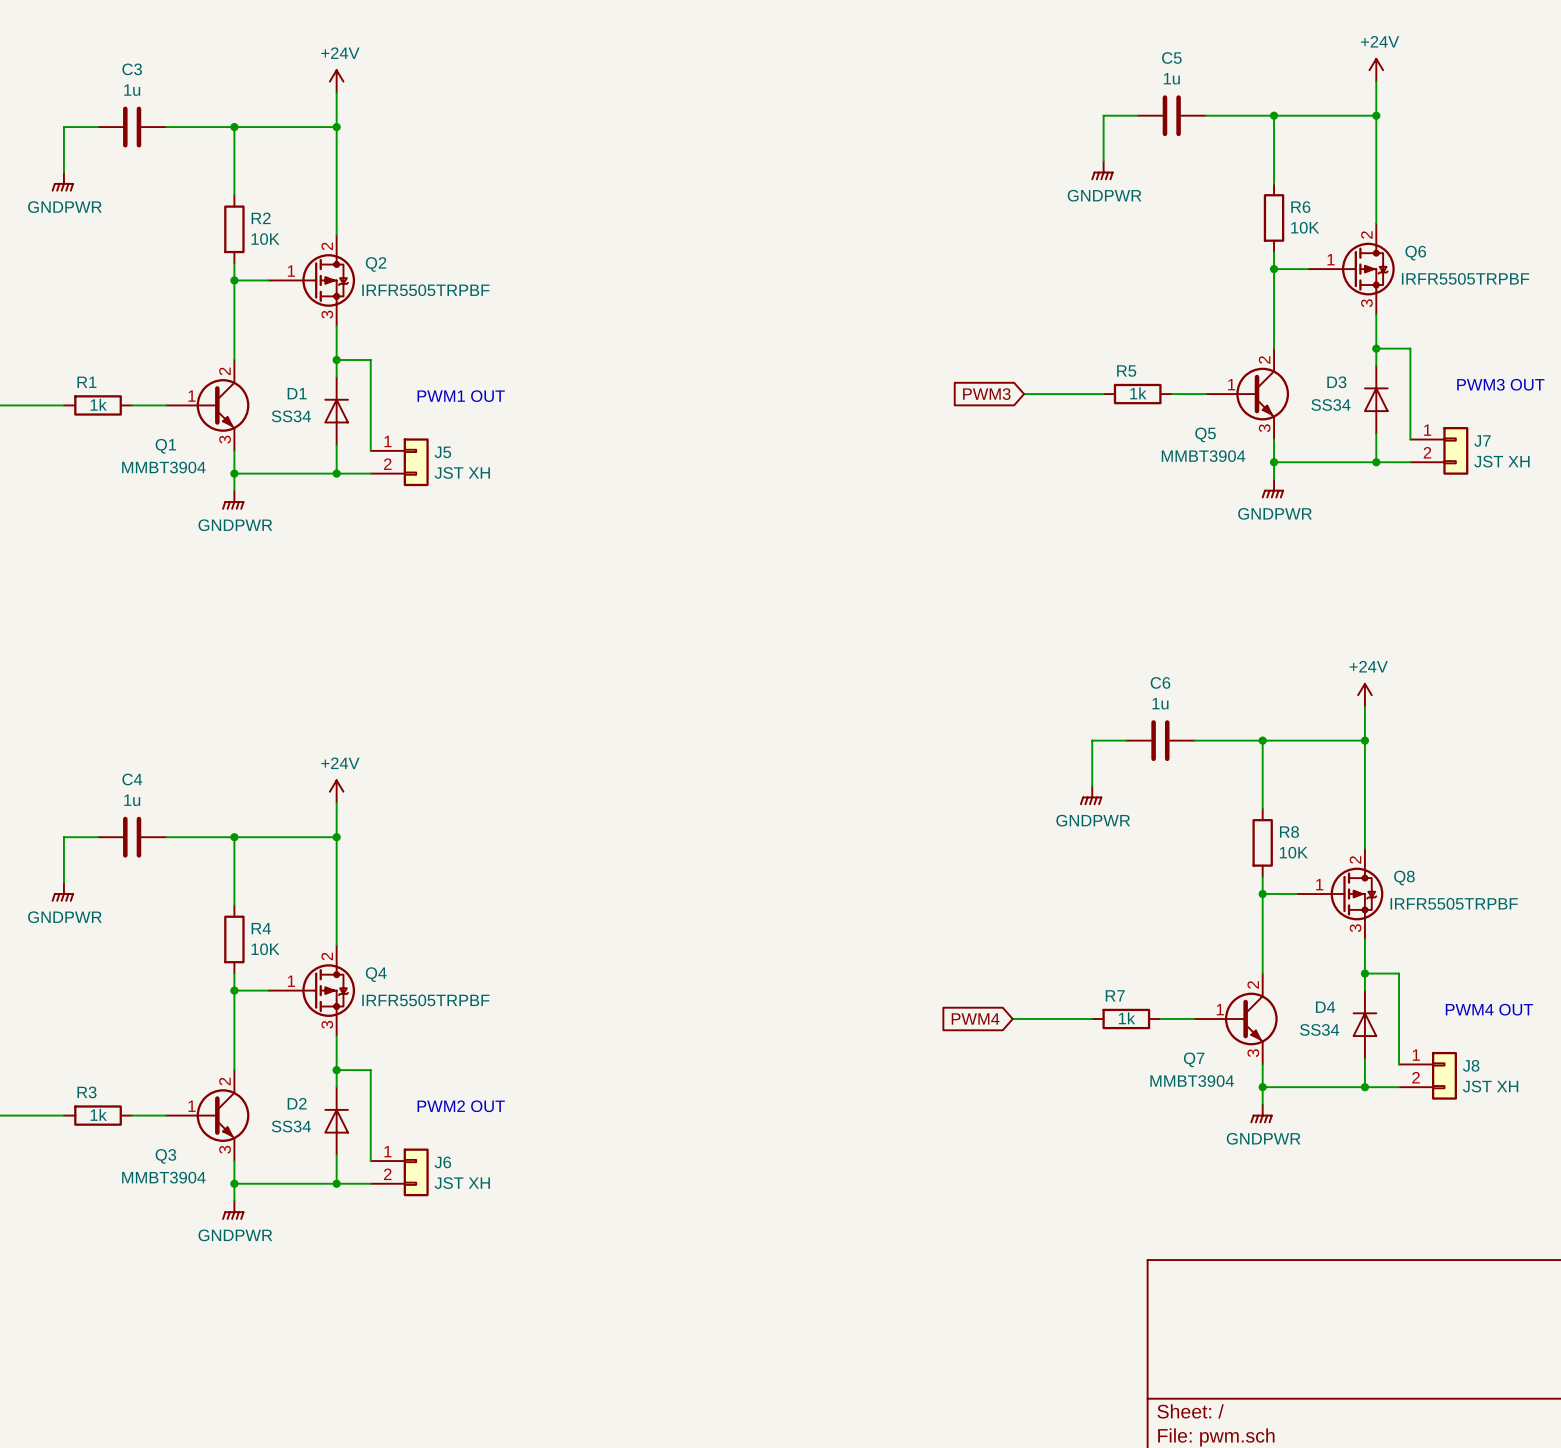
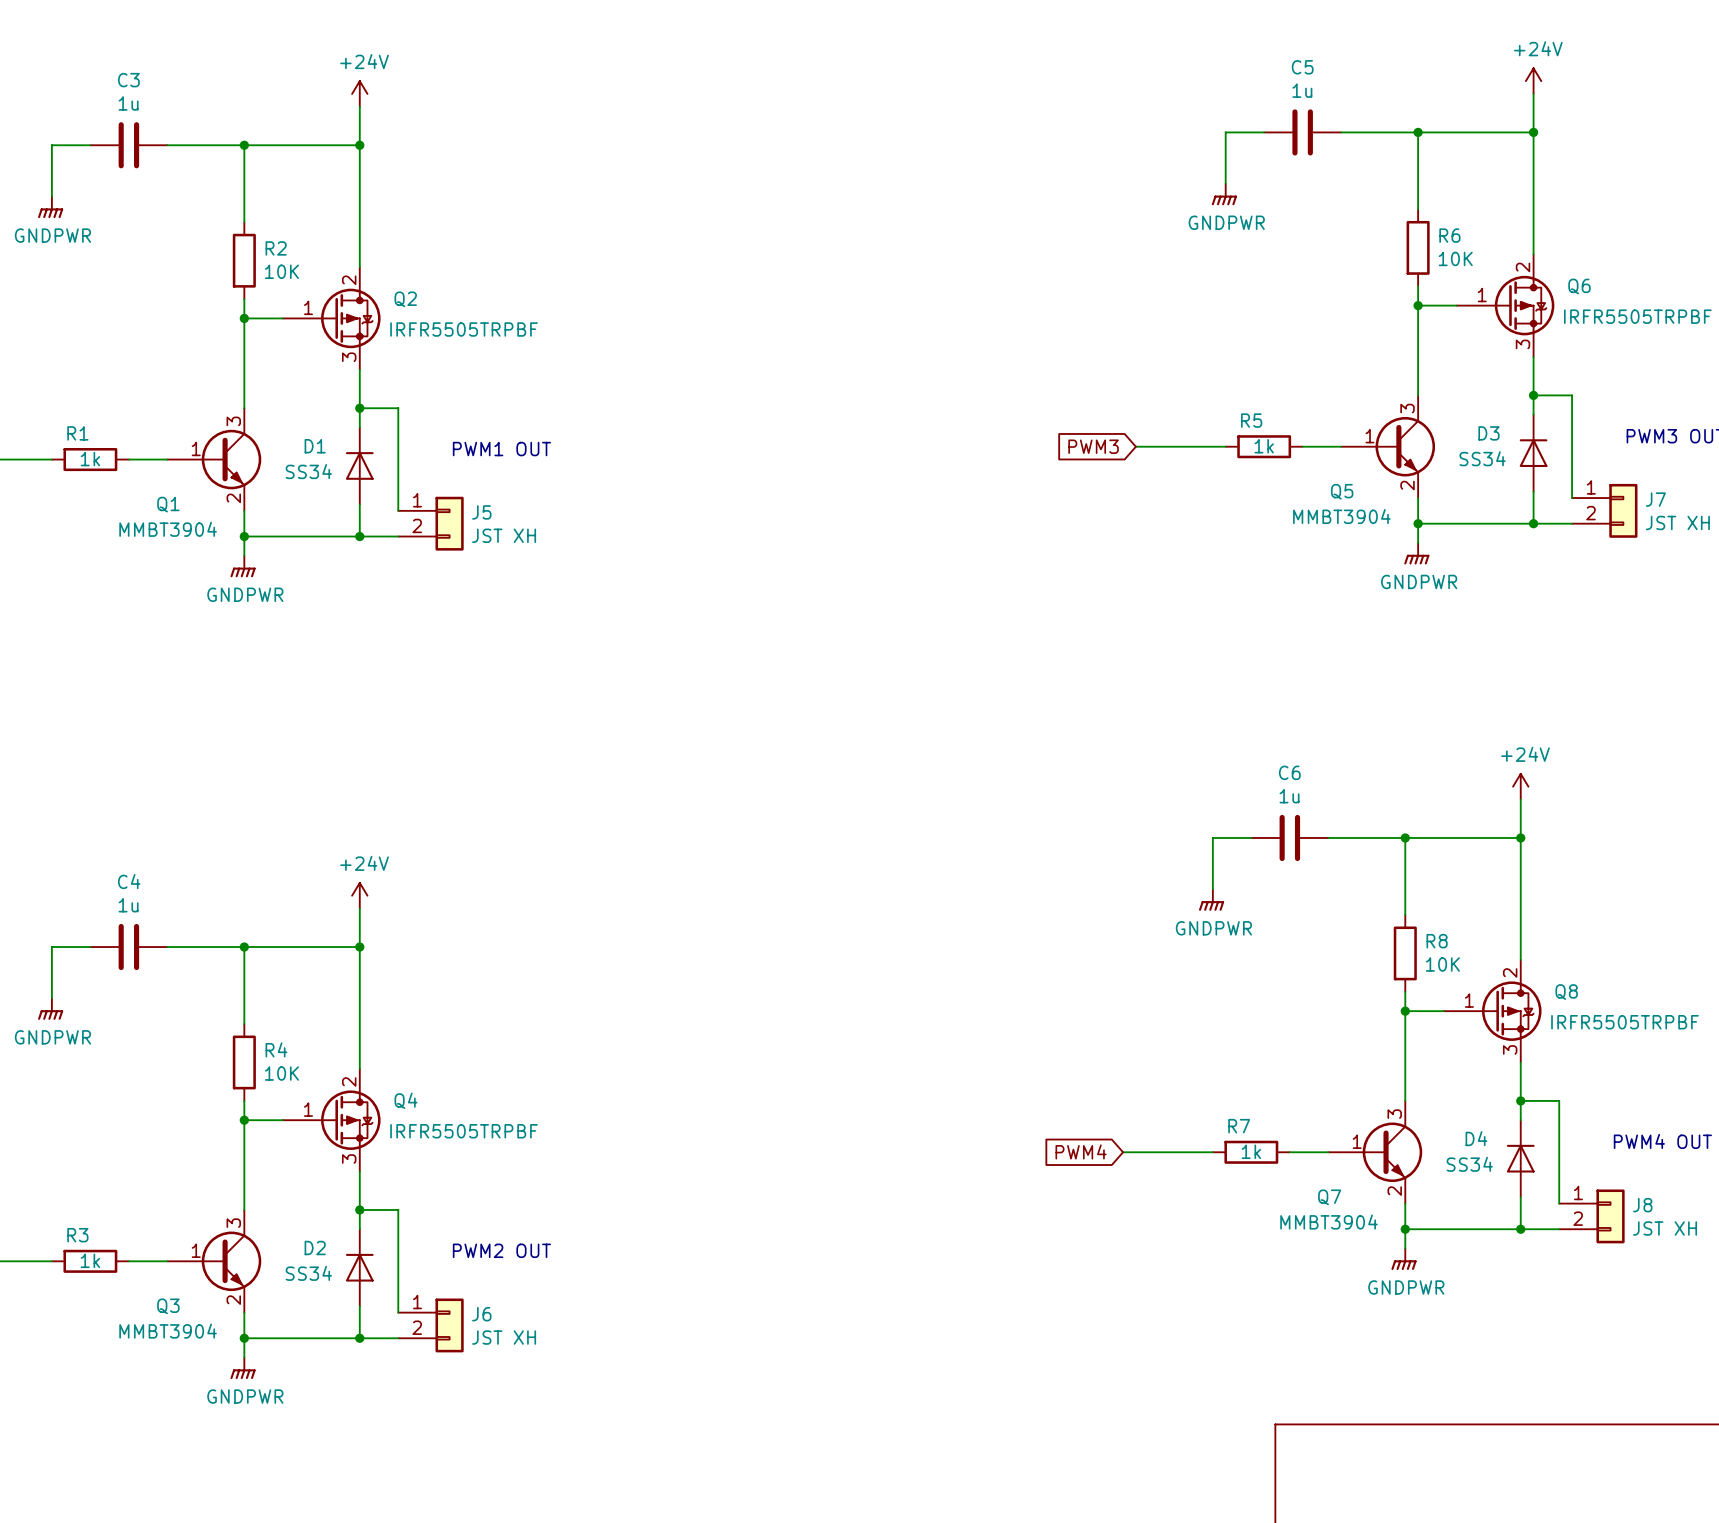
Q5 pin number: 2 (1264, 359) -> 3 (1407, 408)
Q1 pin number: 2 (224, 371) -> 3 (233, 421)
Q5 pin number: 3 (1264, 428) -> 2 (1407, 485)
Q1 pin number: 3 (225, 439) -> 2 (233, 498)
Q7 pin number: 2 (1253, 984) -> 3 (1394, 1114)
Q7 pin number: 3 (1253, 1053) -> 2 (1394, 1191)
Q3 pin number: 2 (224, 1081) -> 3 (233, 1223)
Q3 pin number: 3 (225, 1149) -> 2 (233, 1300)

